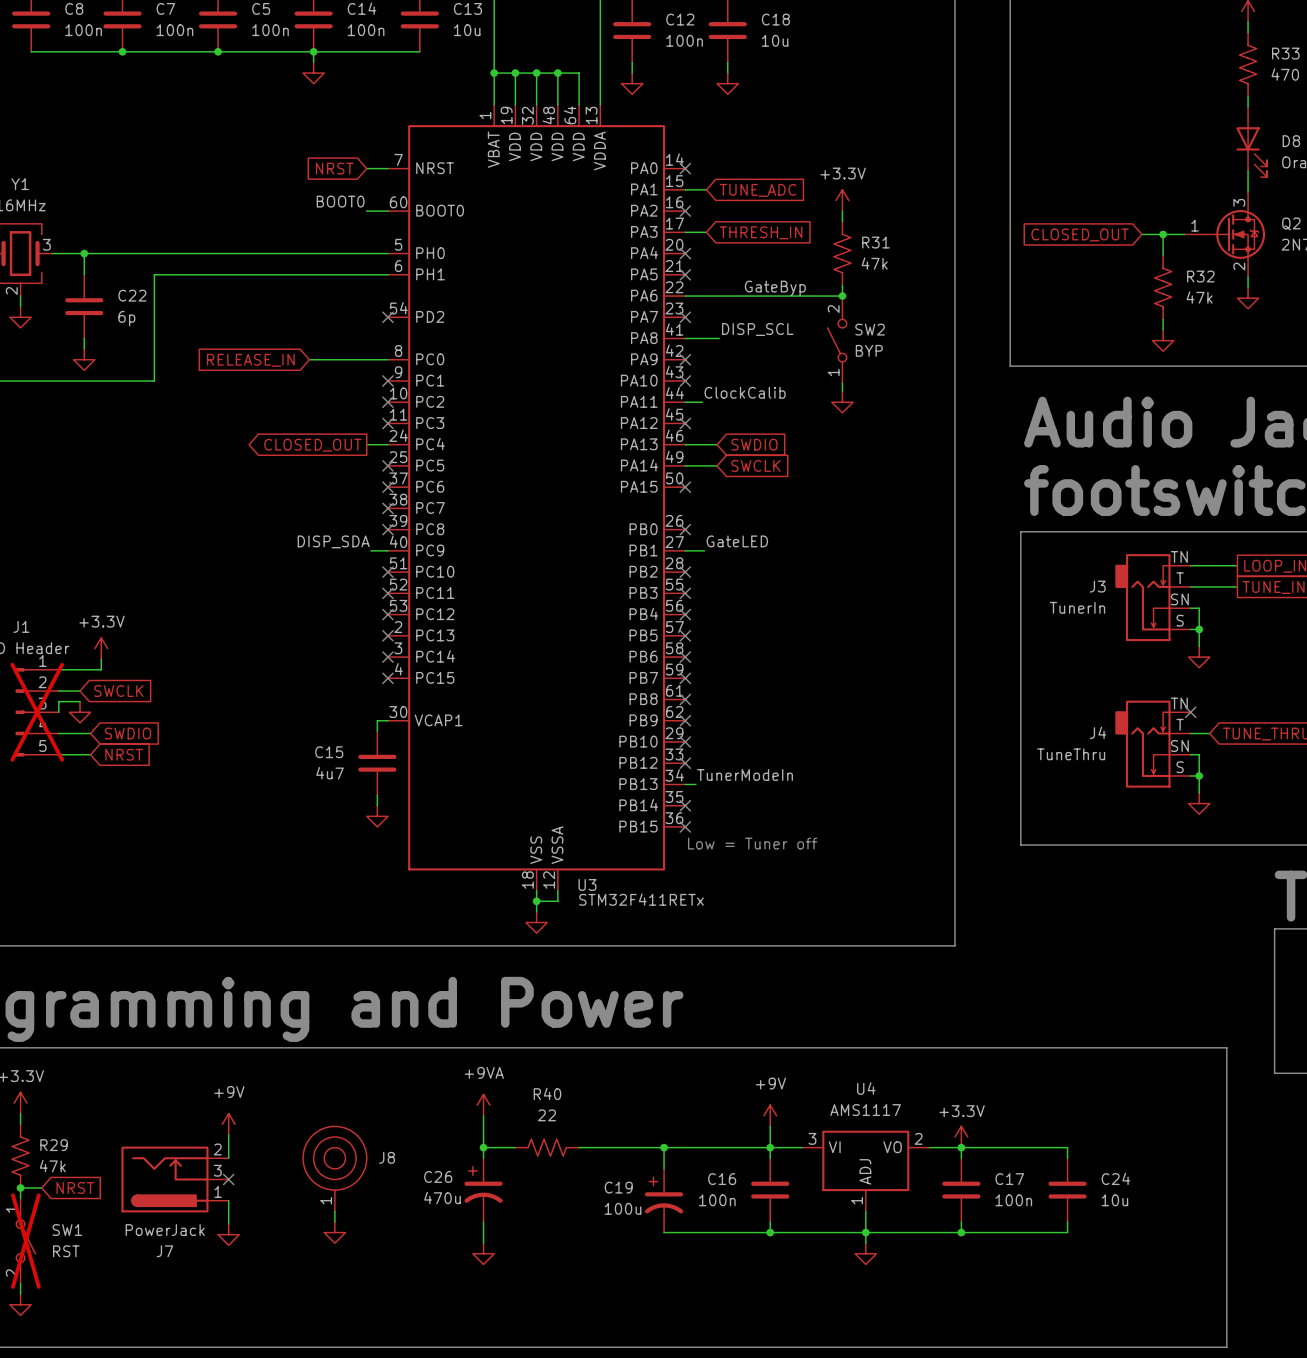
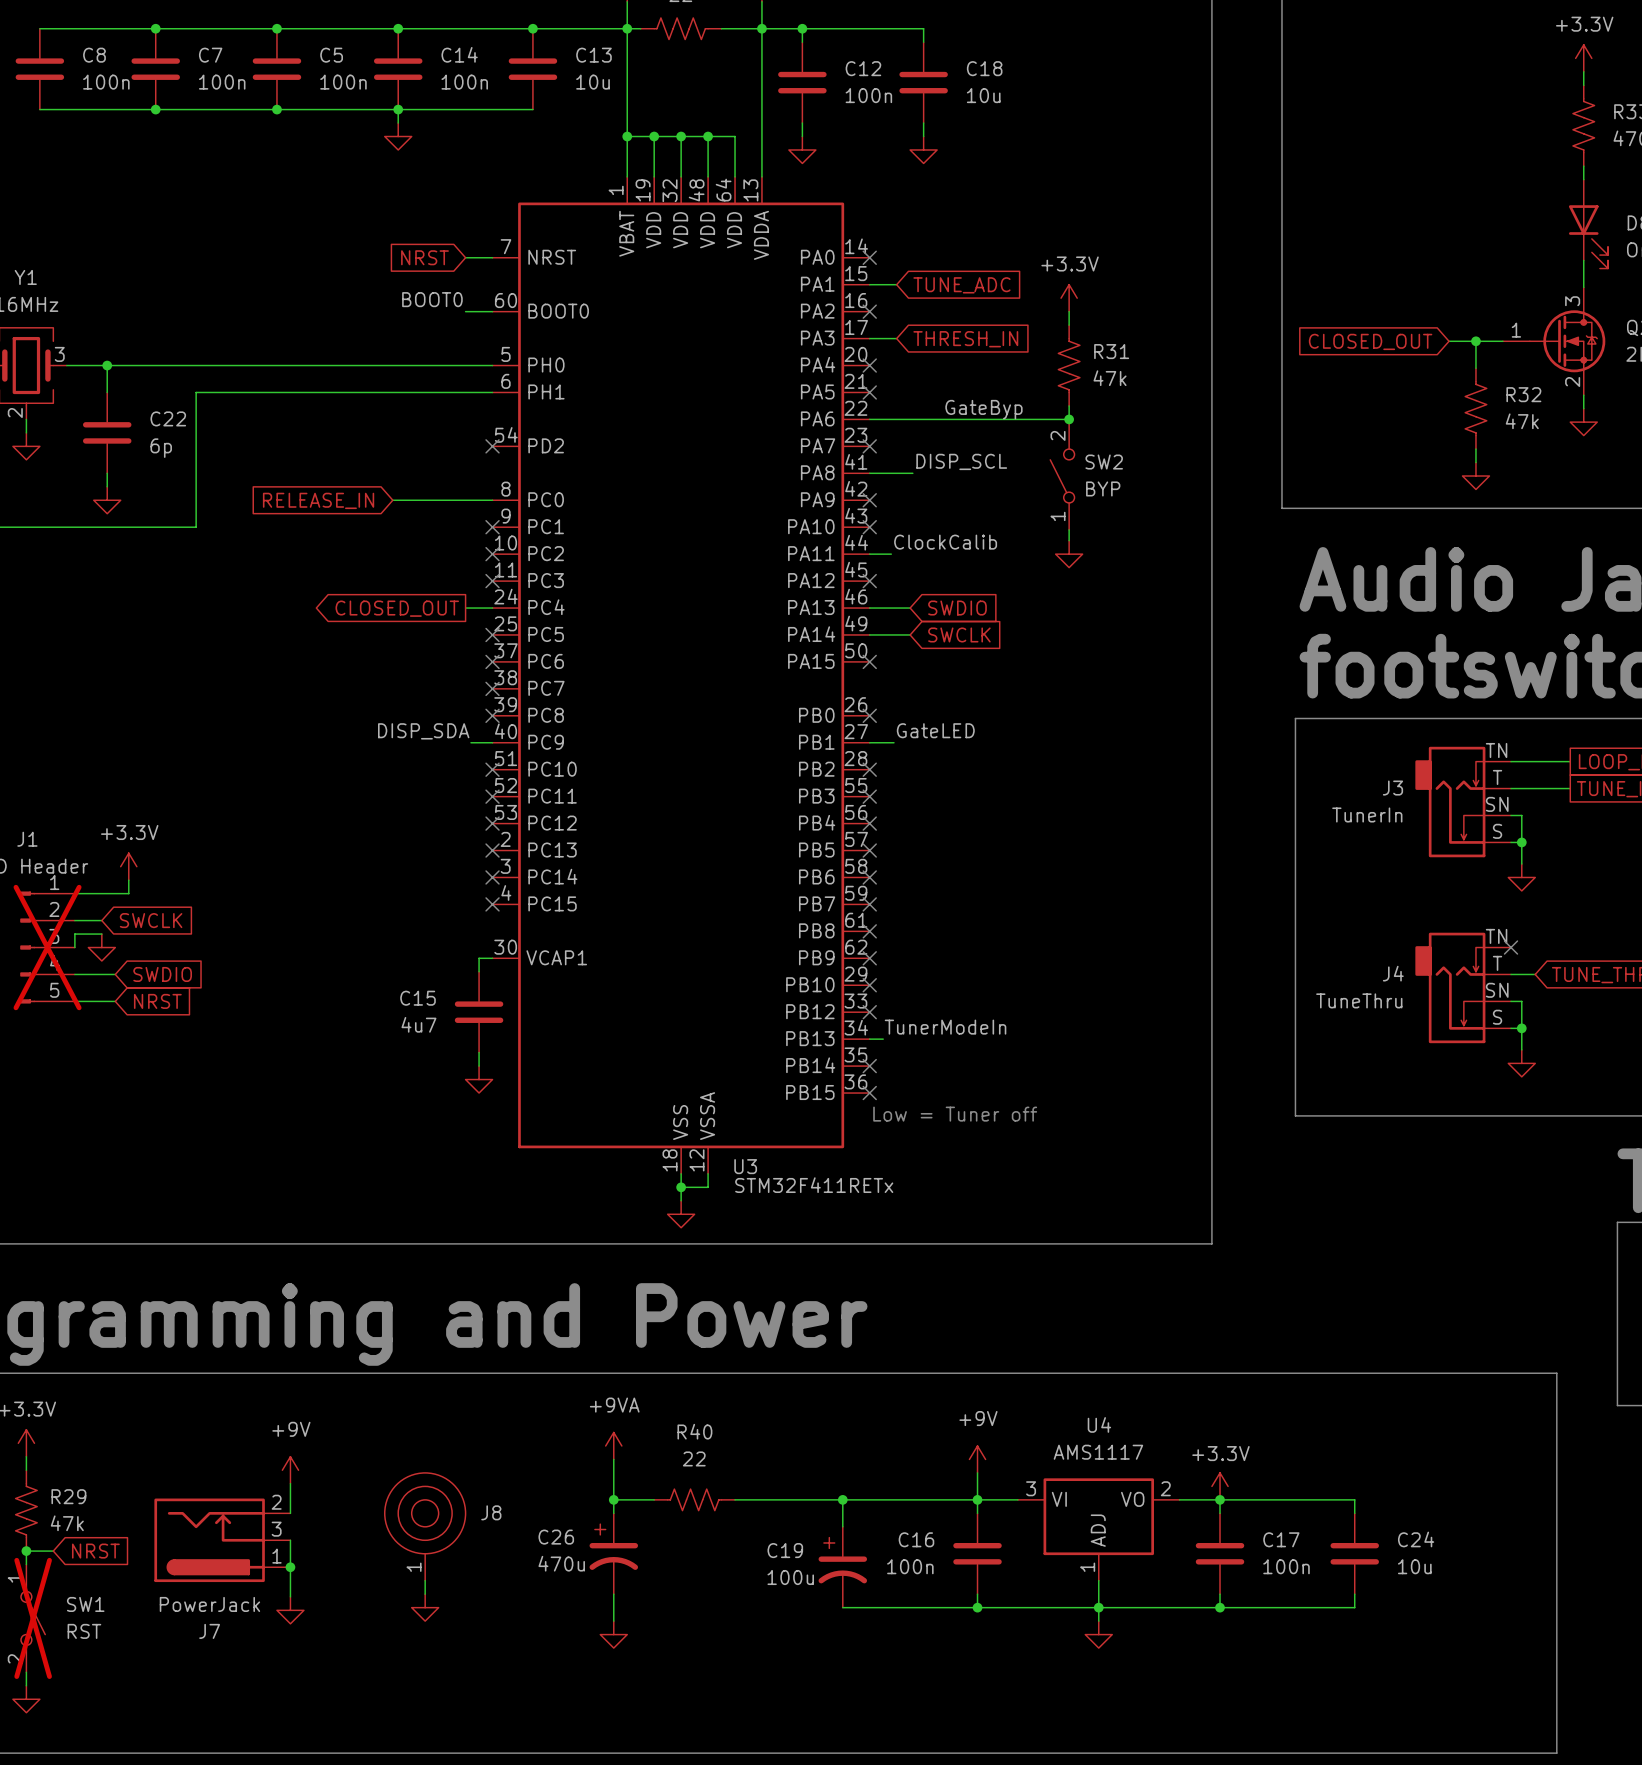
wire: none -> (290, 1540) (290, 1567)
no-connect mark: (228, 1179) -> none
junction: none -> (290, 1567)

